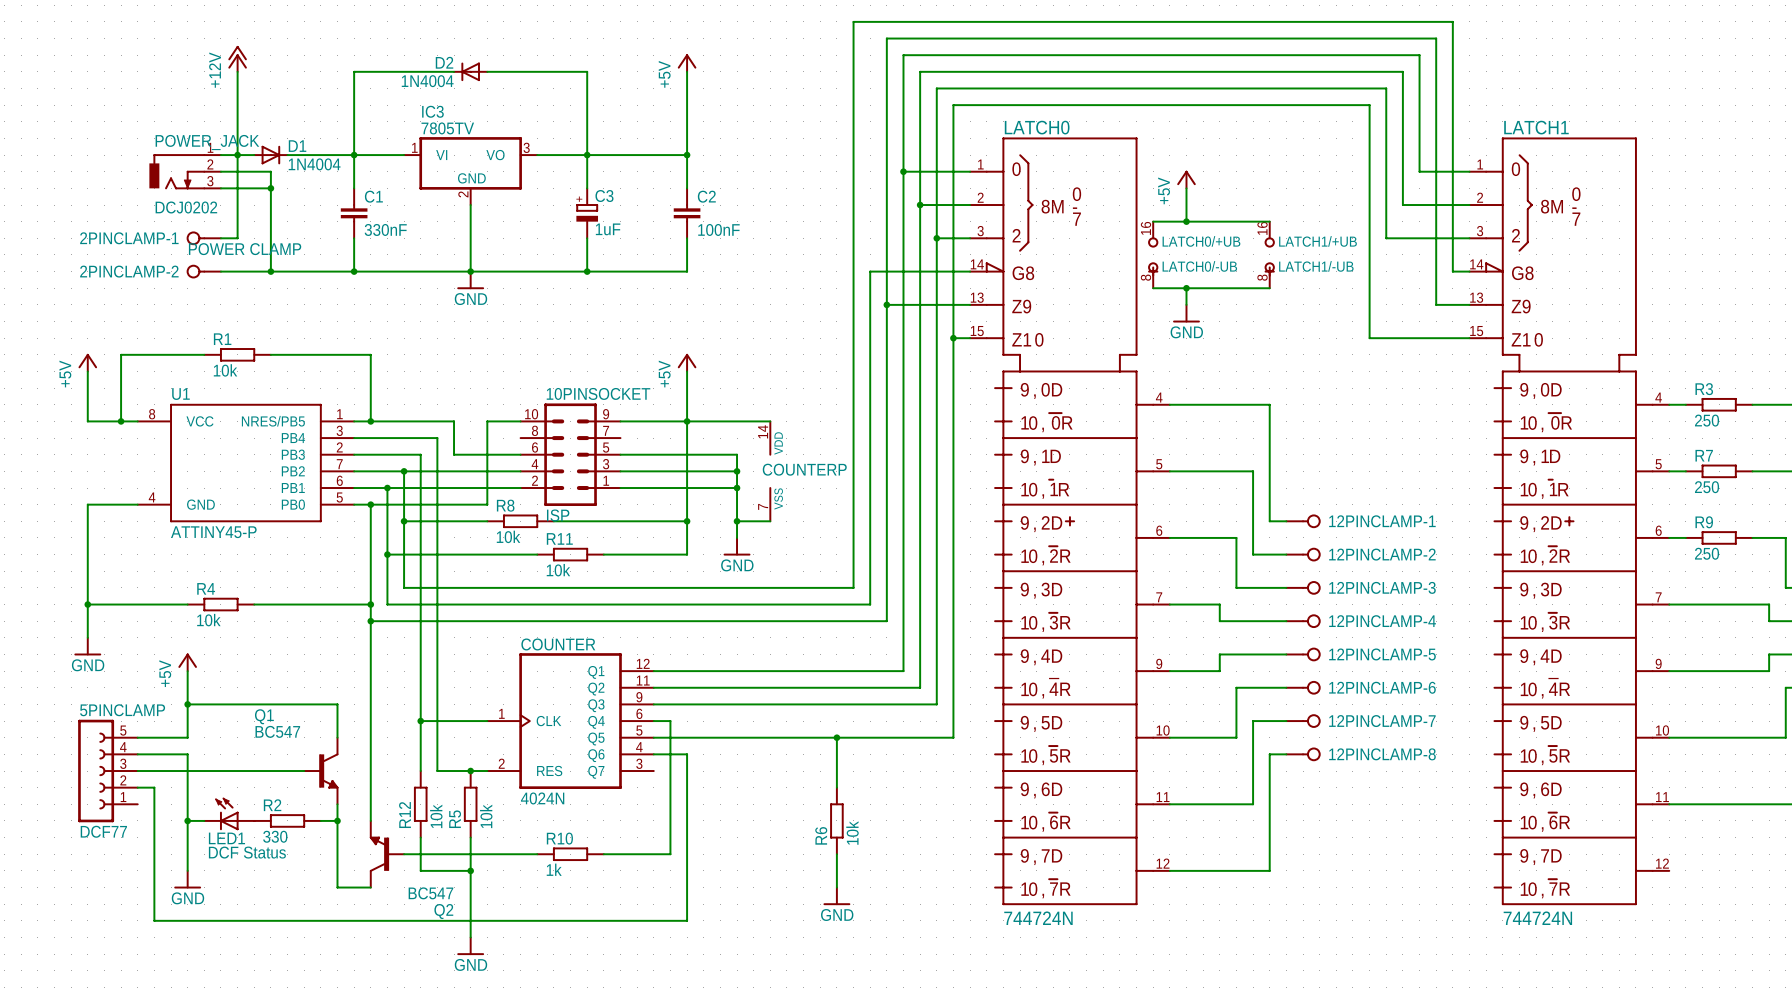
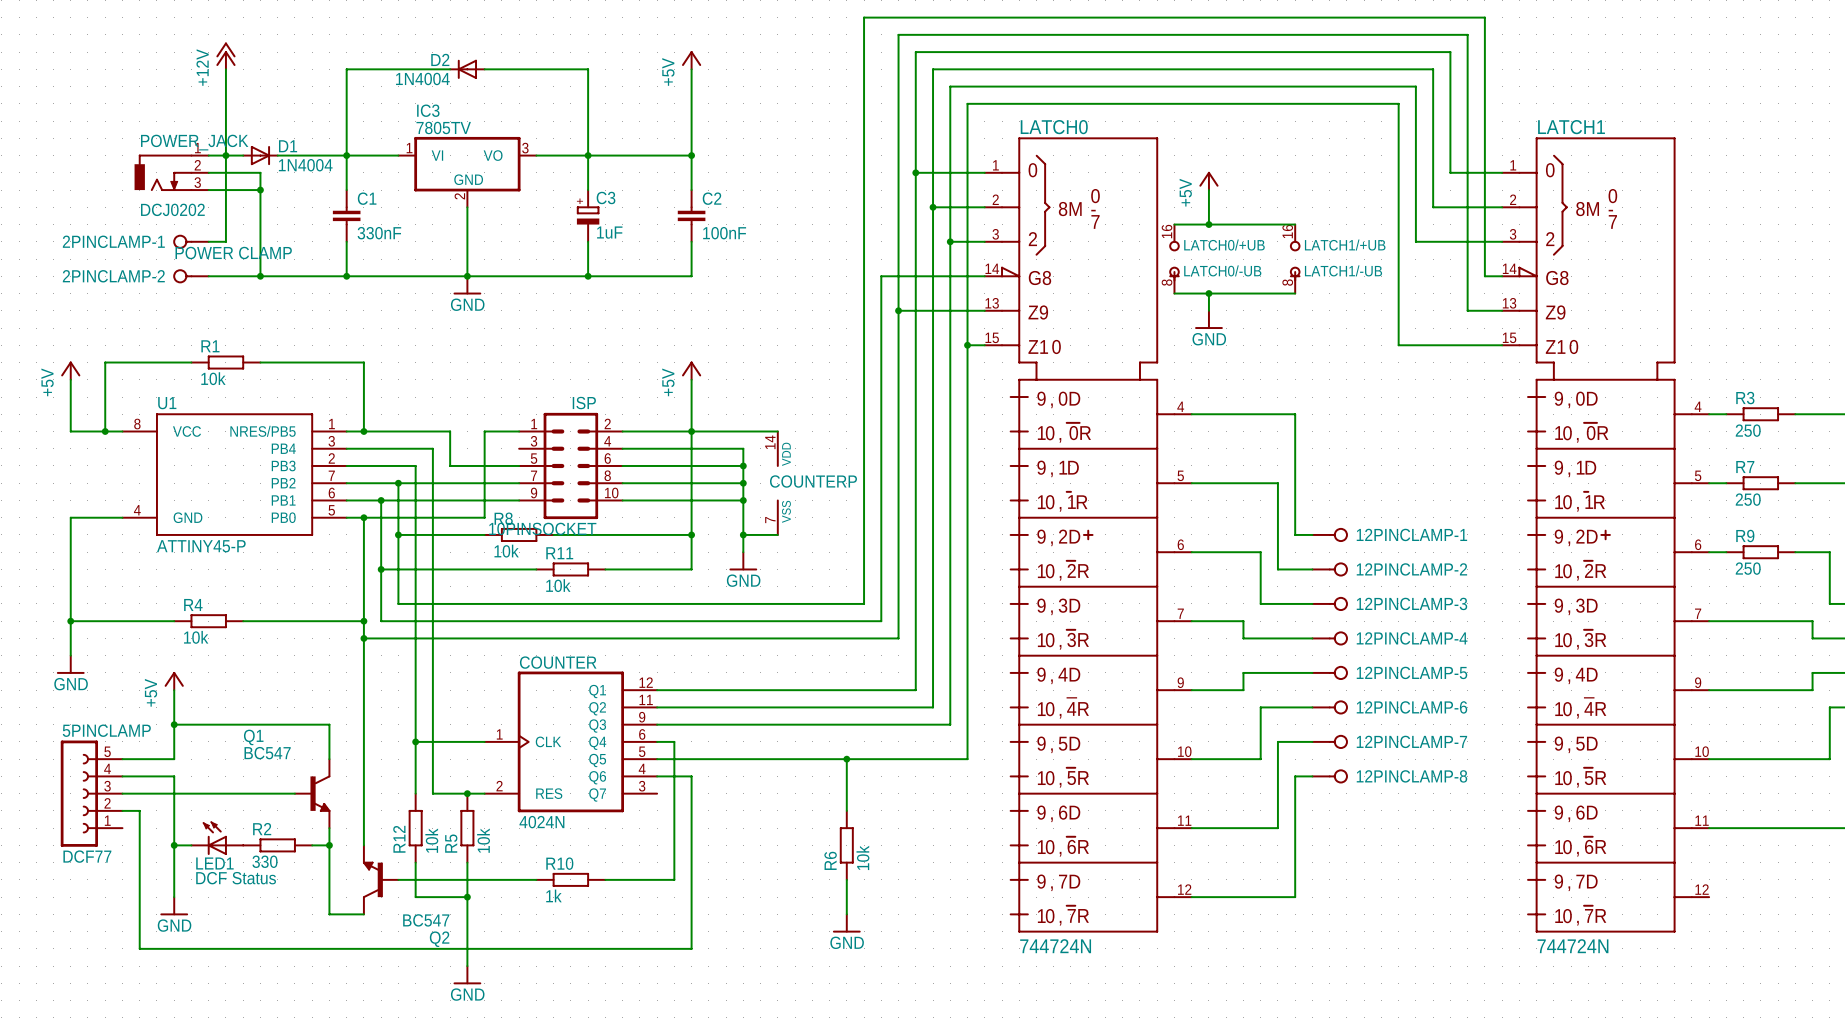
wire: none -> (622, 448) (743, 448) (743, 465)
10PINSOCKET rotation: 0° (570, 454) -> 180° (570, 465)
junction: none -> (743, 465)

